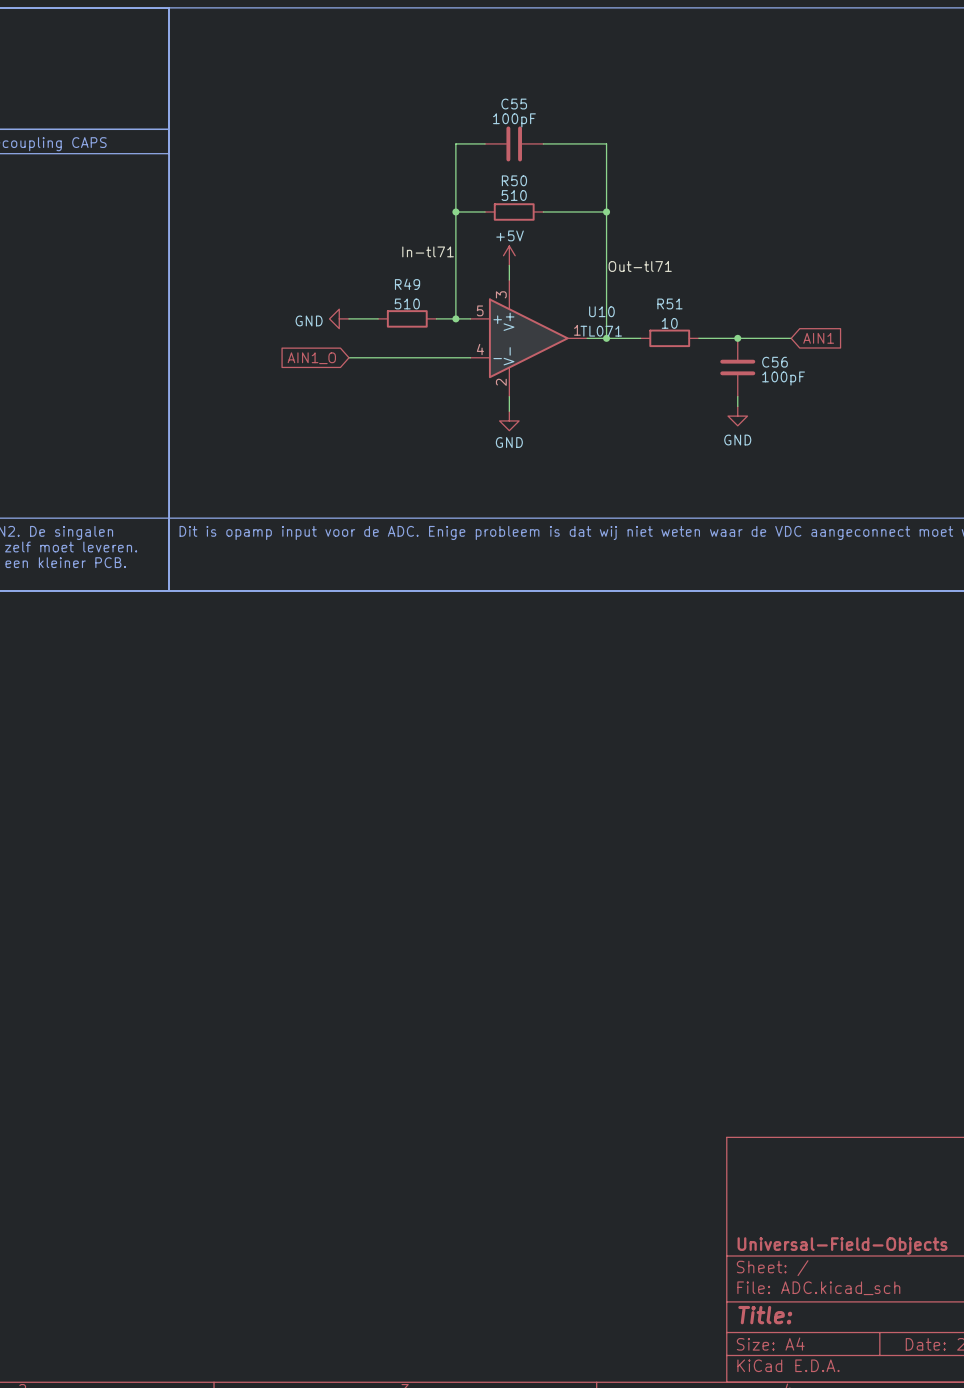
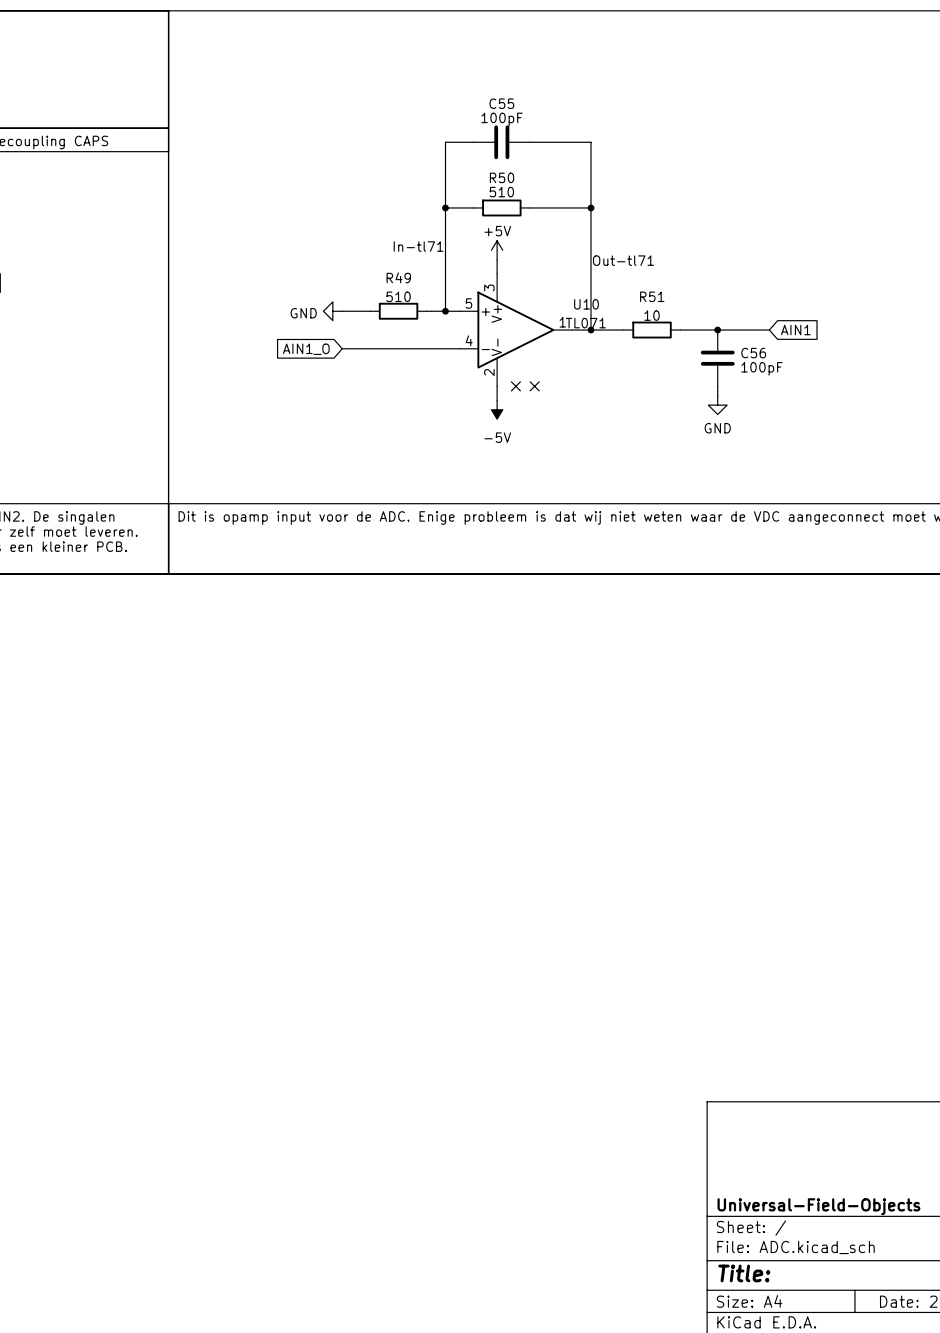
no-connect mark: none -> (515, 386)
no-connect mark: none -> (534, 386)
power symbol: GND (509, 420) -> -5V (497, 409)

